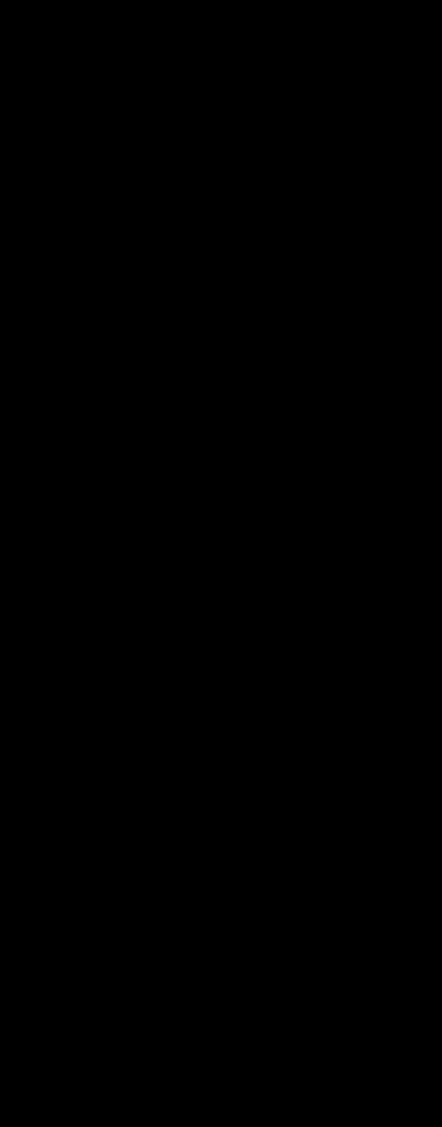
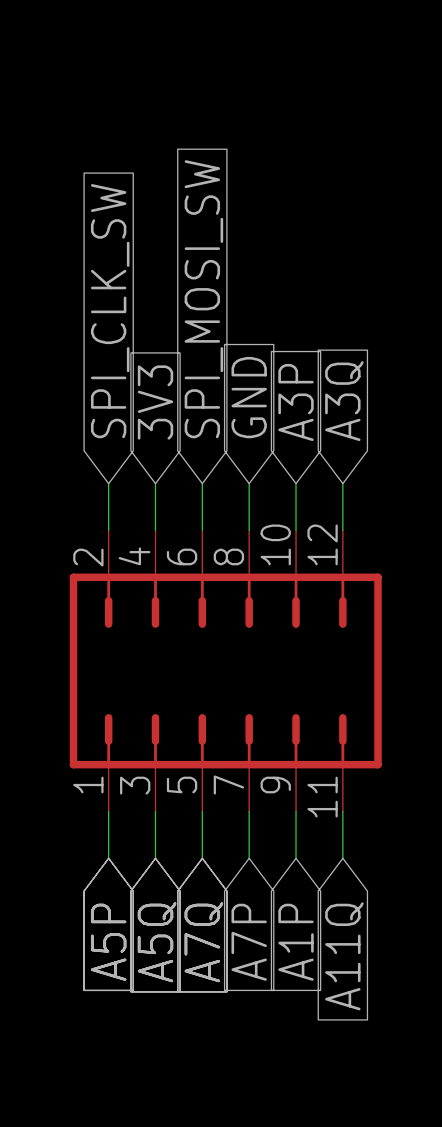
global label: none -> SPI_MOSI_SW (203, 299)
global label: none -> SPI_CLK_SW (110, 311)
global label: none -> GND (249, 397)
global label: none -> A3Q (344, 401)
global label: none -> 3V3 (155, 402)
global label: none -> A3P (296, 402)
wire: none -> (108, 483) (108, 530)
wire: none -> (155, 483) (155, 530)
wire: none -> (202, 483) (202, 530)
wire: none -> (249, 483) (249, 530)
wire: none -> (296, 483) (296, 530)
wire: none -> (342, 483) (342, 530)
part: none -> (225, 670)
wire: none -> (108, 811) (108, 858)
wire: none -> (155, 811) (155, 858)
wire: none -> (202, 811) (202, 858)
wire: none -> (249, 811) (249, 858)
wire: none -> (296, 811) (296, 858)
wire: none -> (342, 811) (342, 858)
global label: none -> A5P (108, 942)
global label: none -> A5Q (157, 942)
global label: none -> A7Q (203, 942)
global label: none -> A7P (249, 942)
global label: none -> A1P (296, 942)
global label: none -> A11Q (344, 956)

